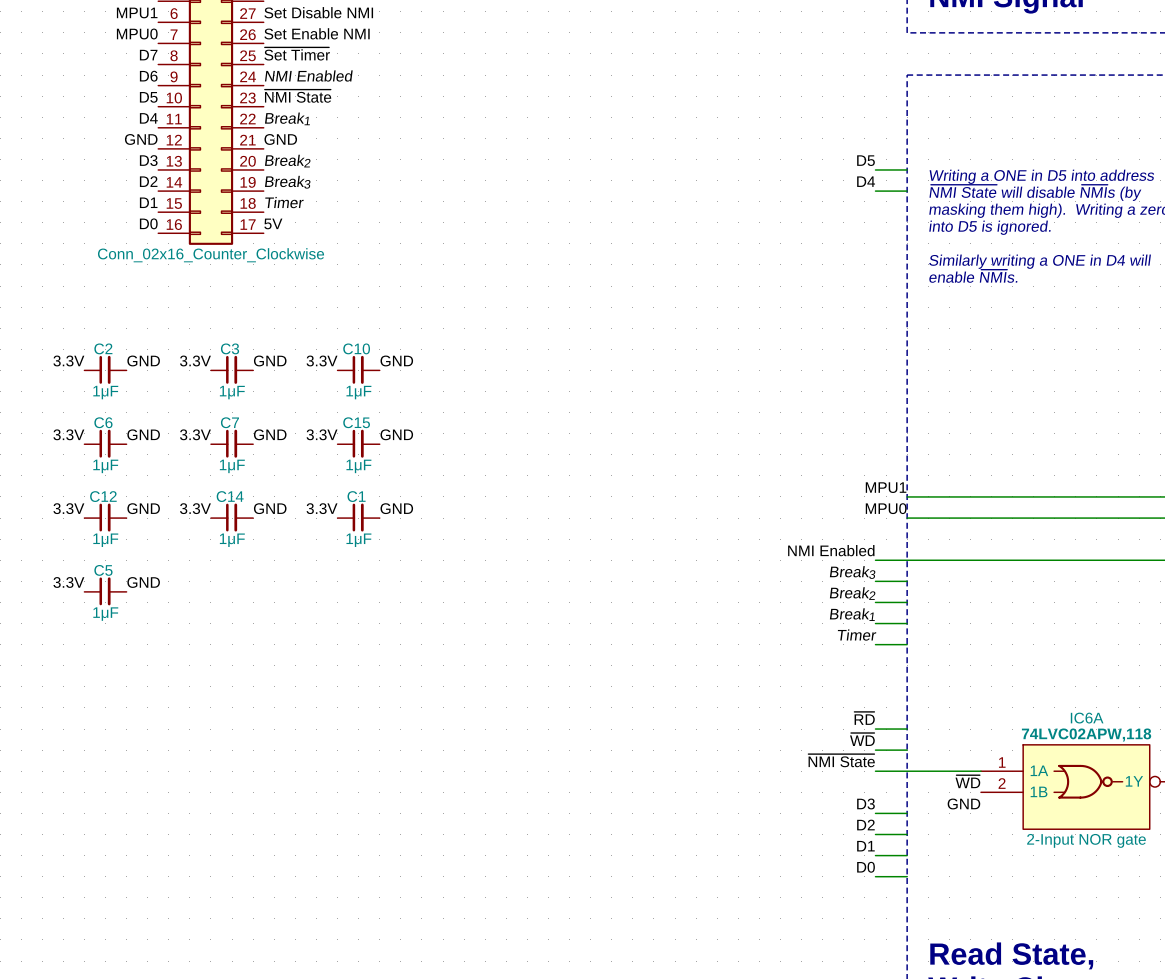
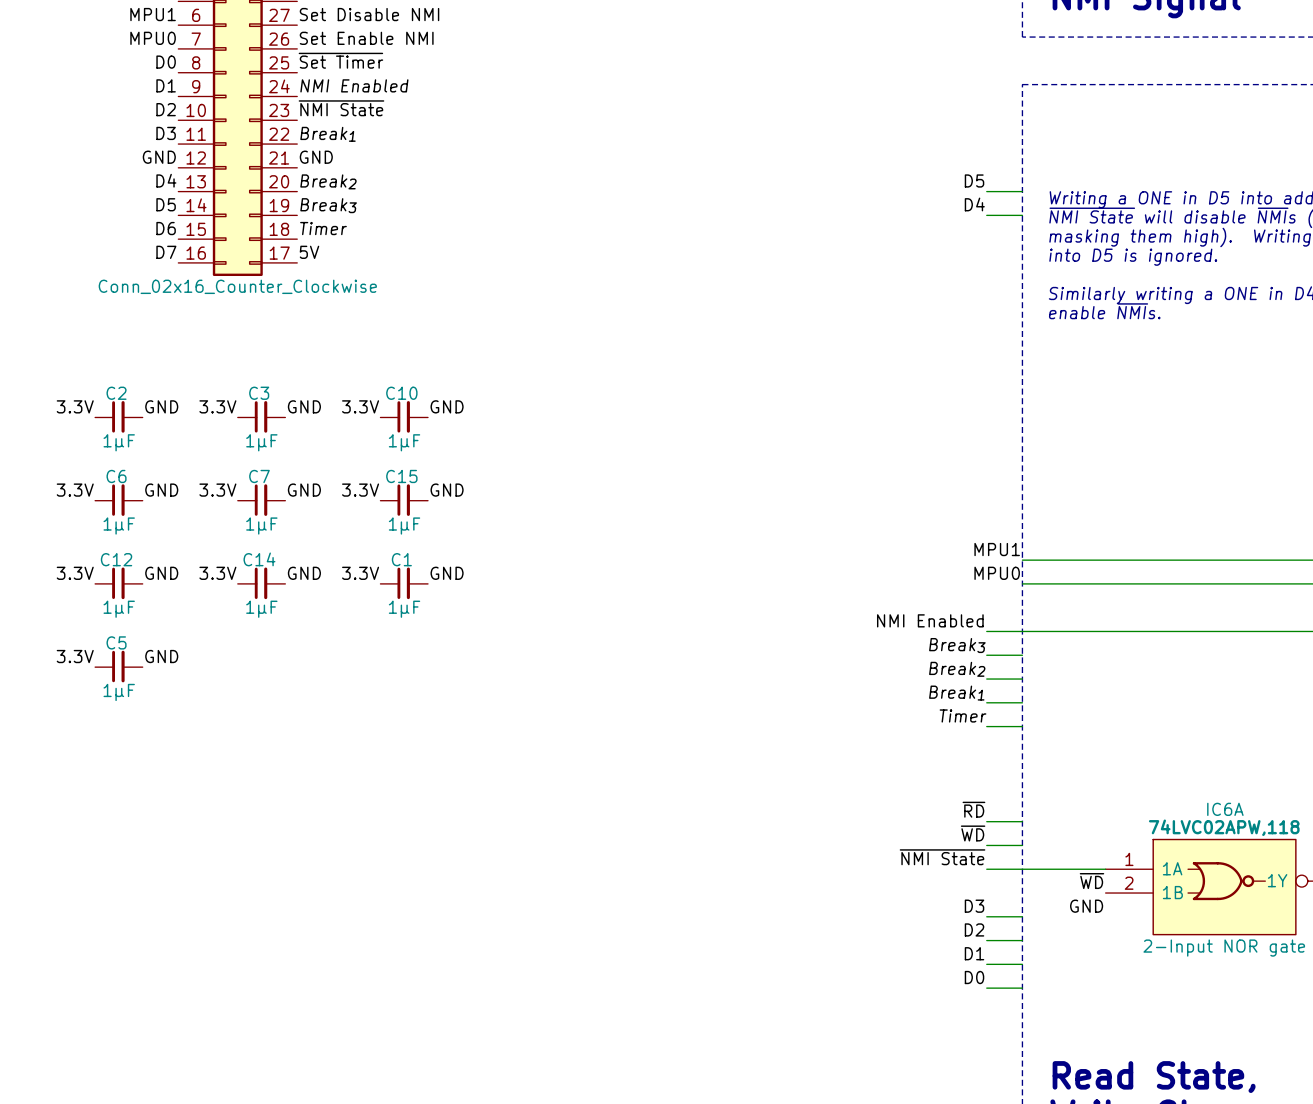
label: D7 (148, 55) -> D0 (166, 62)
label: D6 (148, 76) -> D1 (166, 85)
label: D5 (148, 97) -> D2 (166, 109)
label: D4 (148, 118) -> D3 (166, 133)
label: D3 (148, 160) -> D4 (166, 180)
label: D2 (148, 181) -> D5 (166, 204)
label: D1 (148, 202) -> D6 (166, 228)
label: D0 (148, 223) -> D7 (166, 252)

